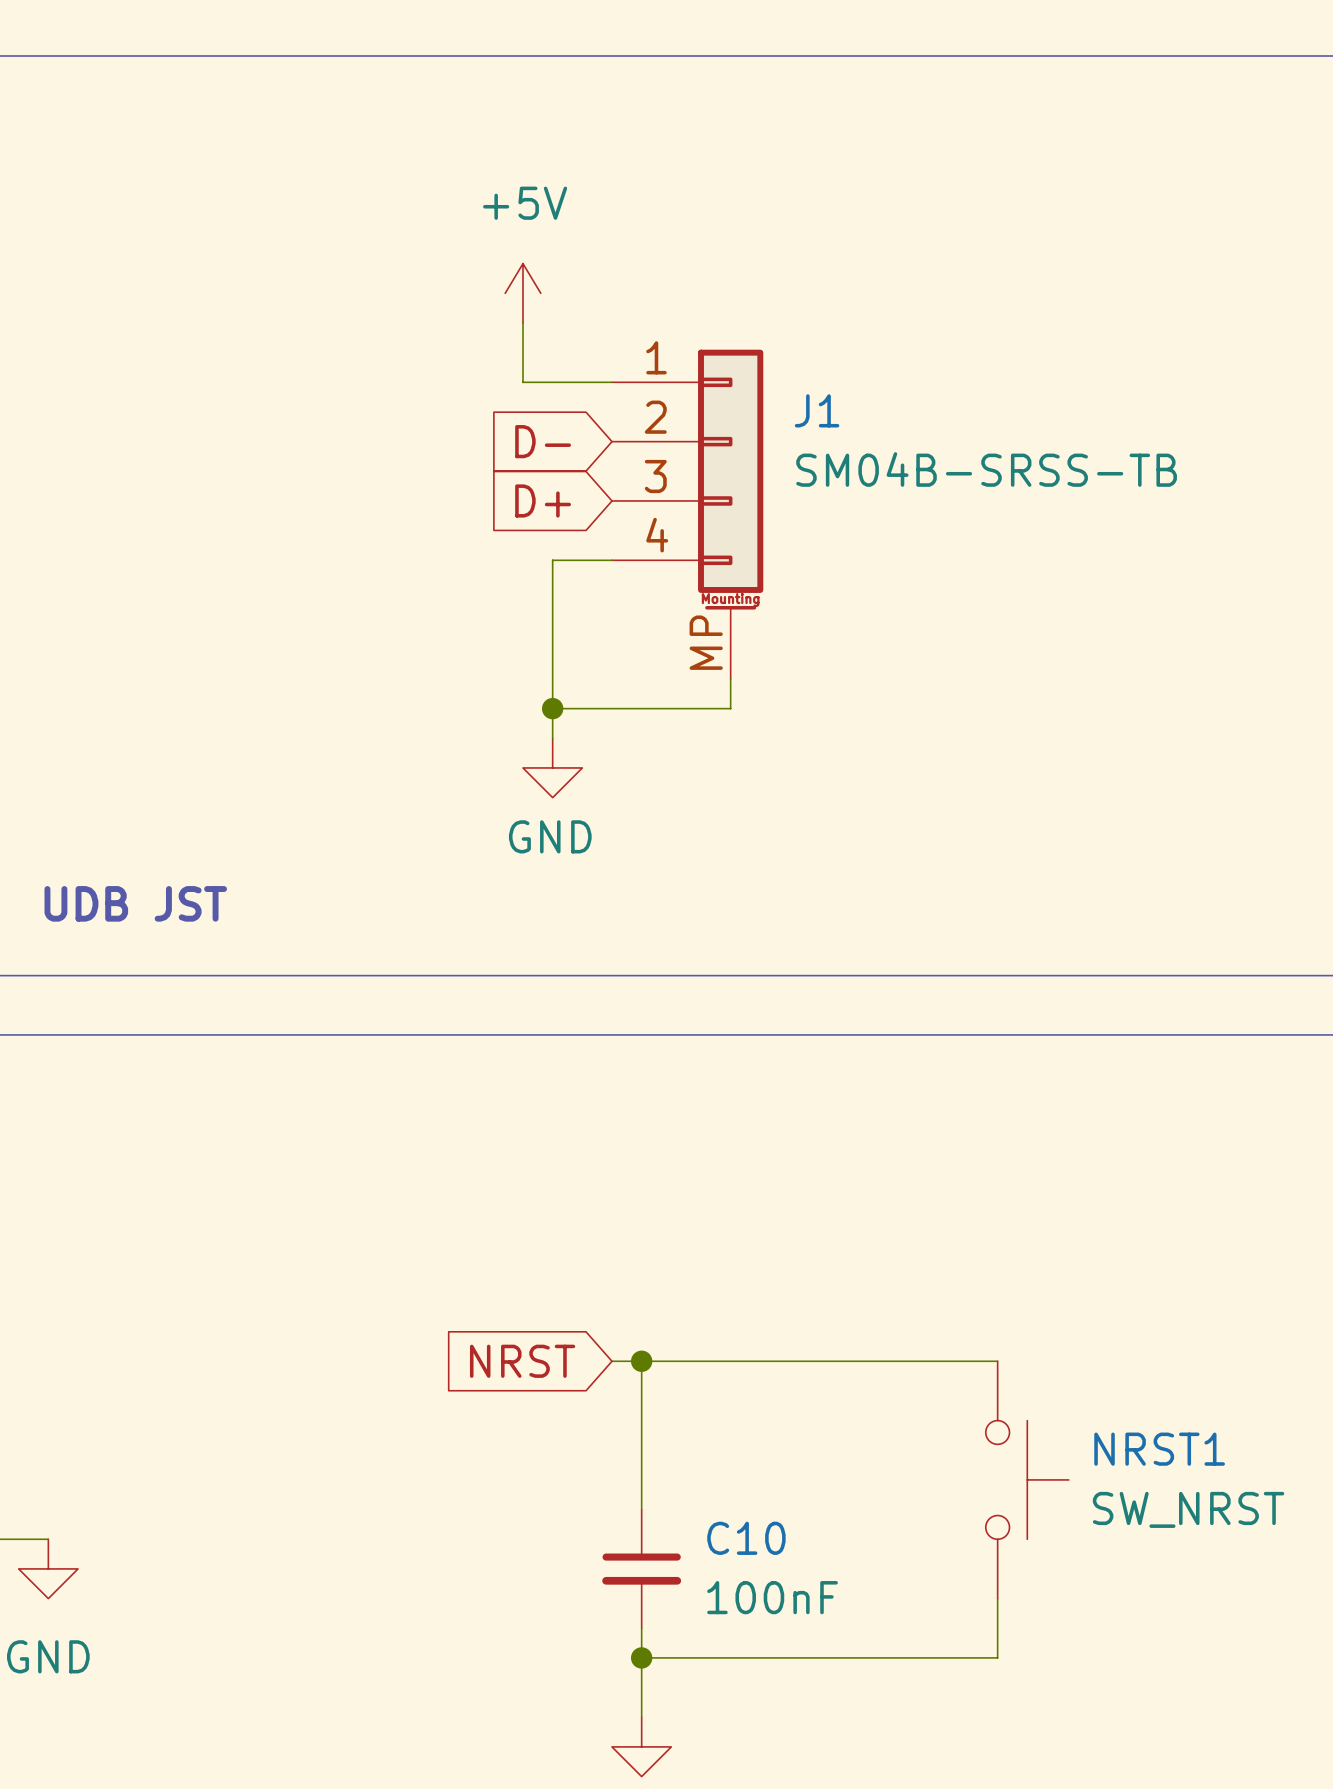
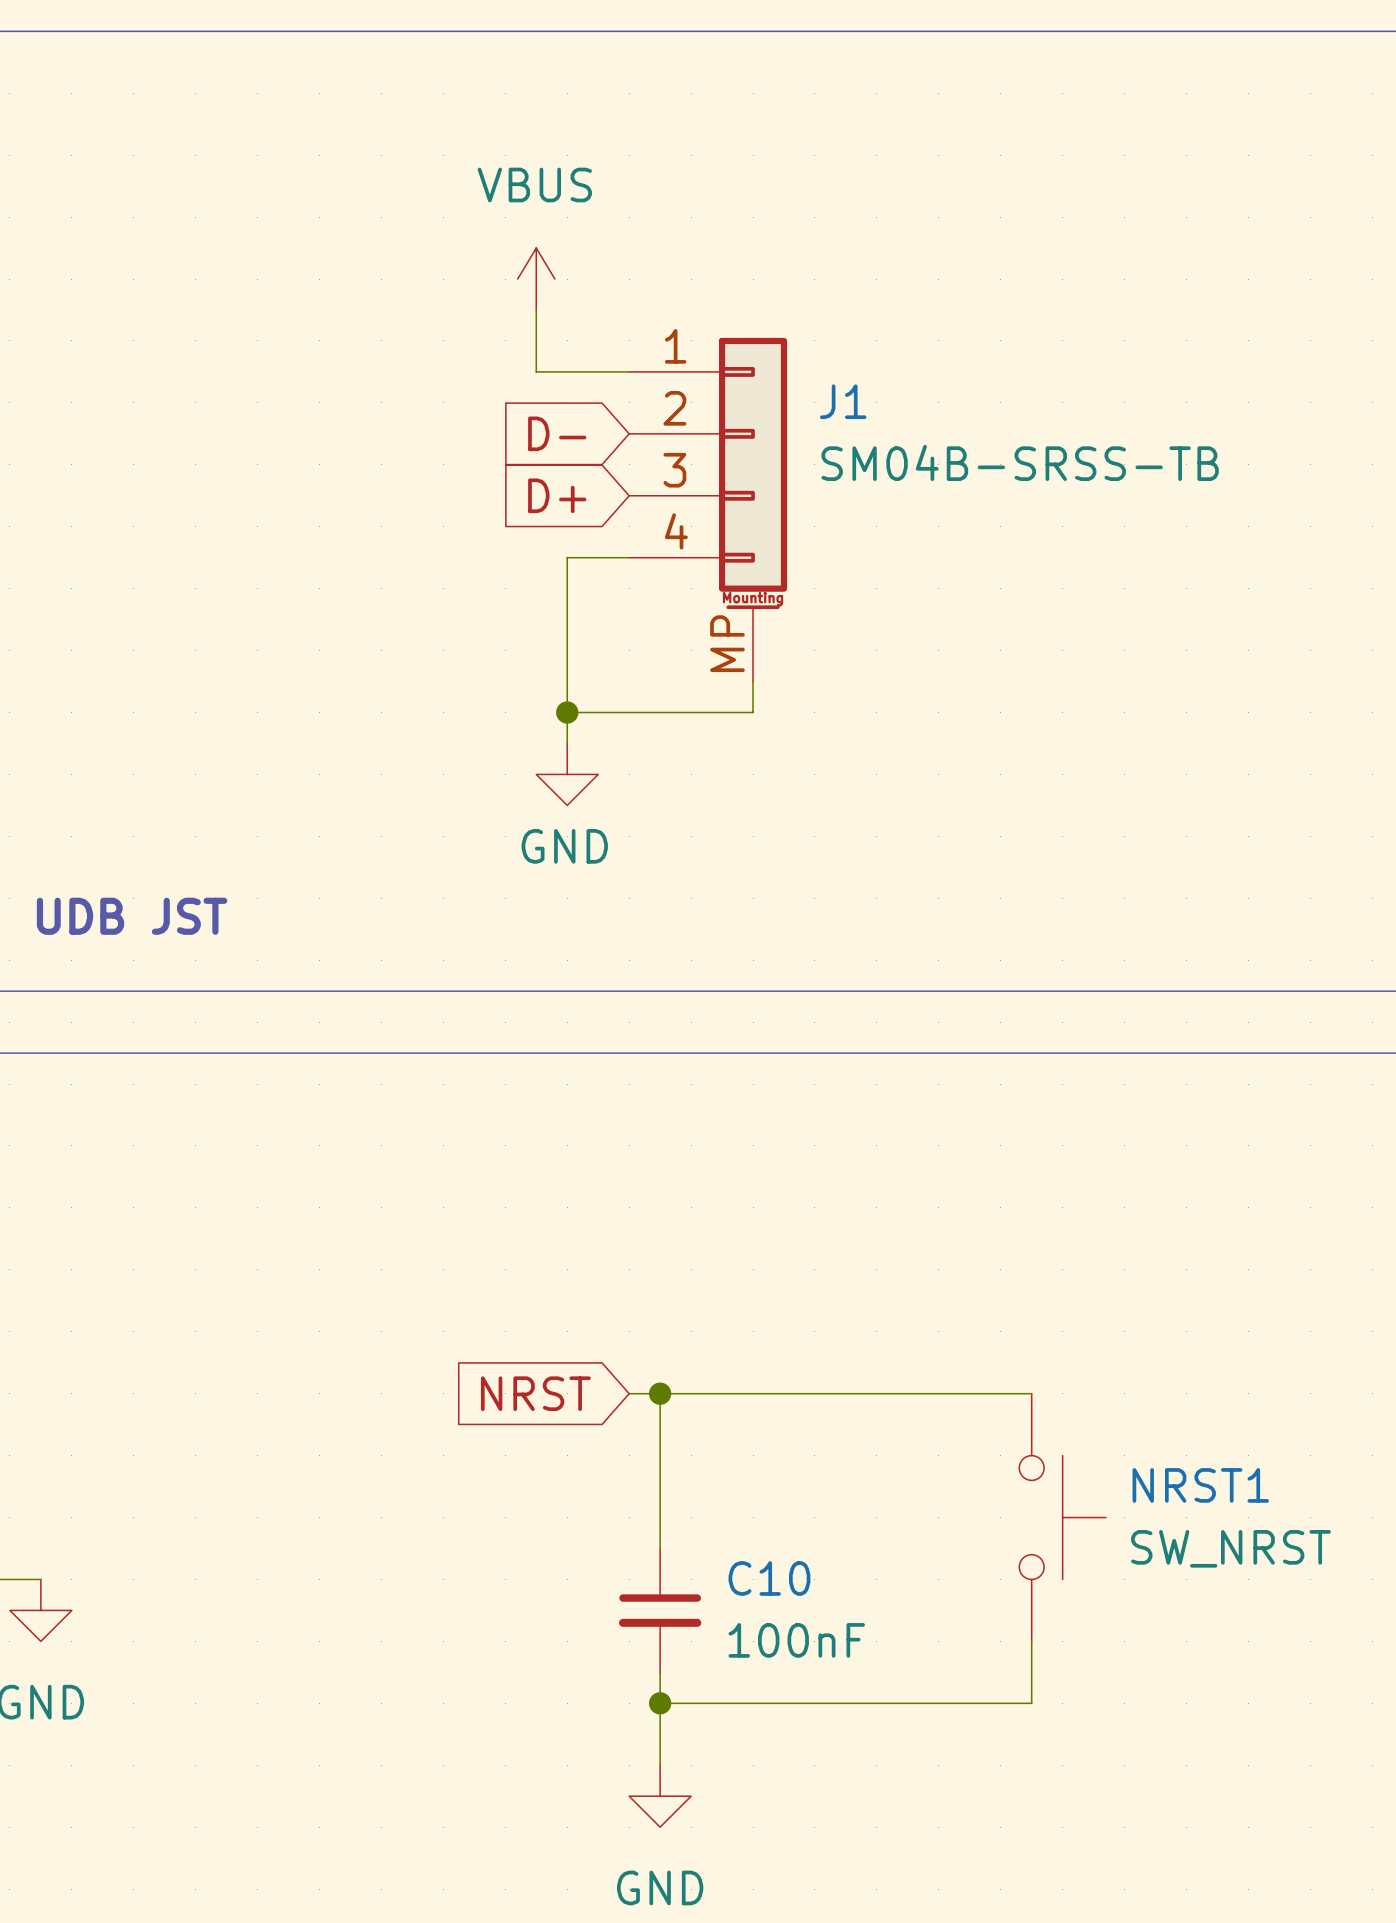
power symbol: +5V (523, 293) -> VBUS (536, 279)

